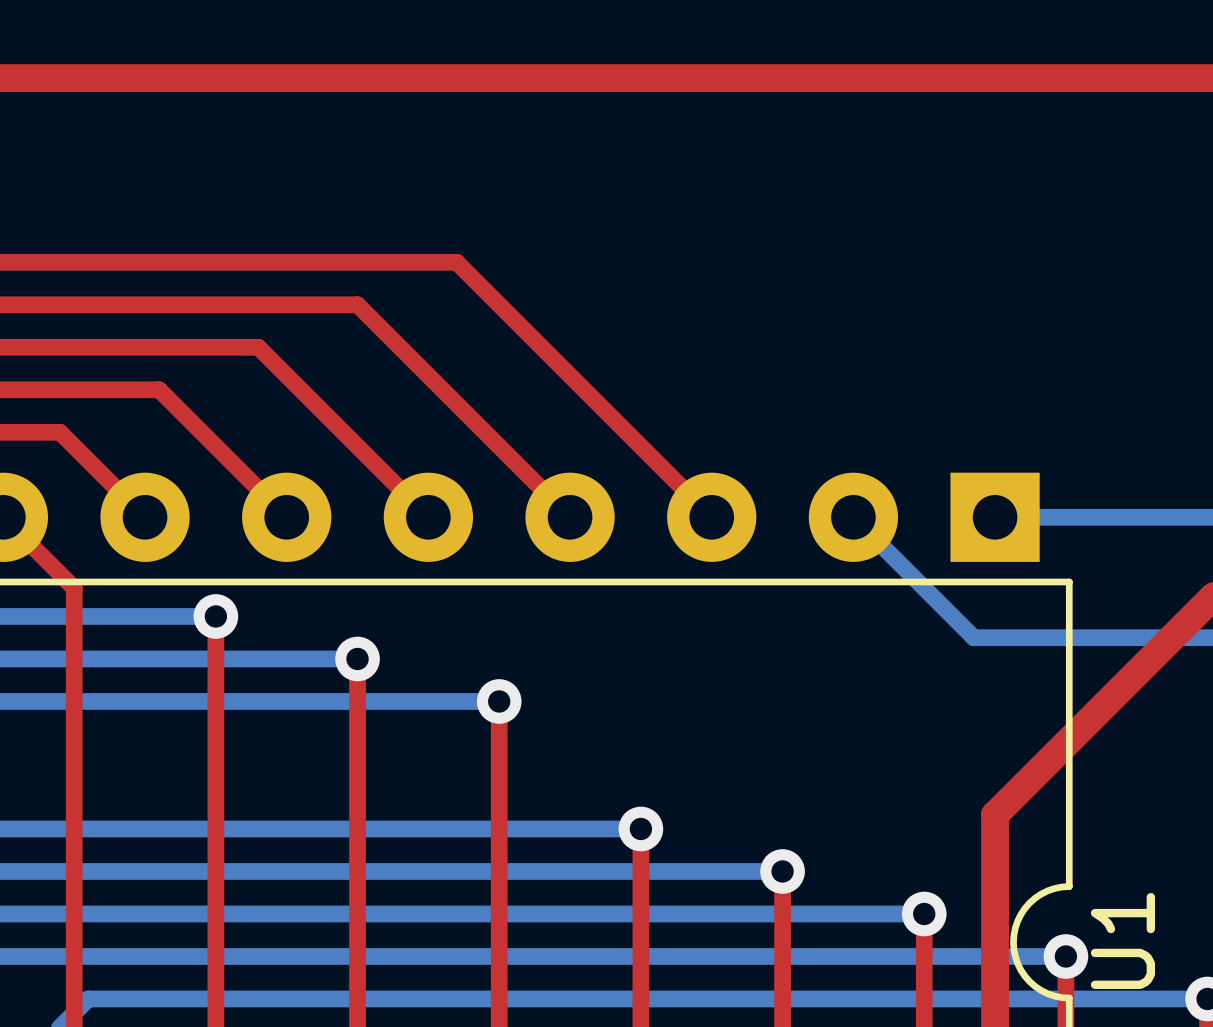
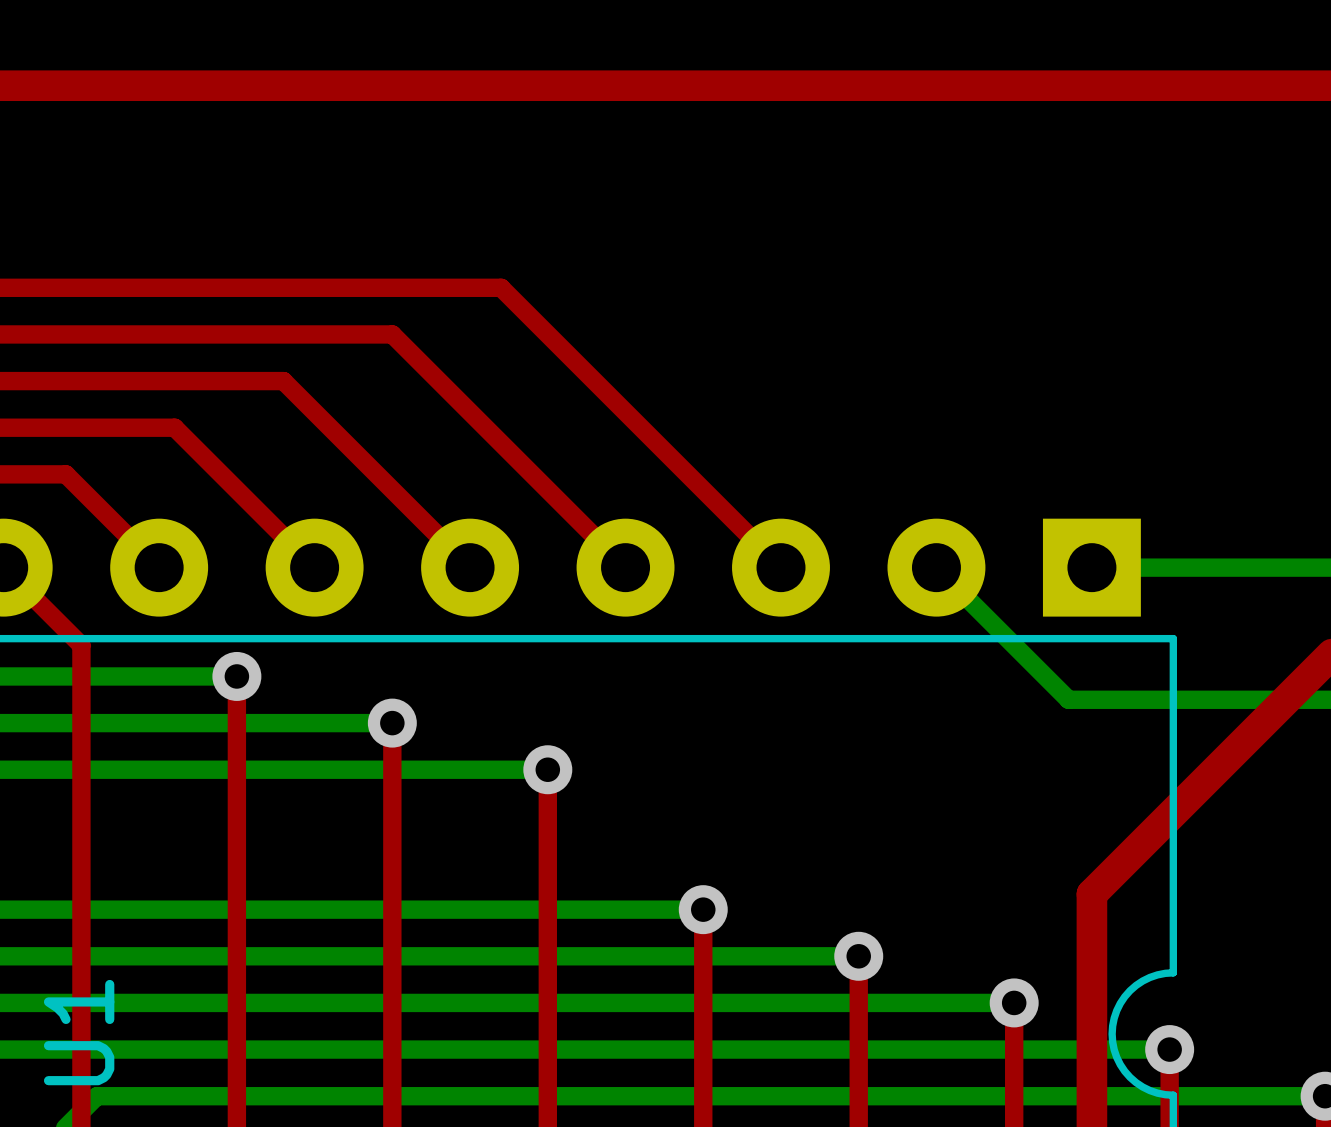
U1 name position: U1 (1122, 940) -> U1 (79, 1032)

